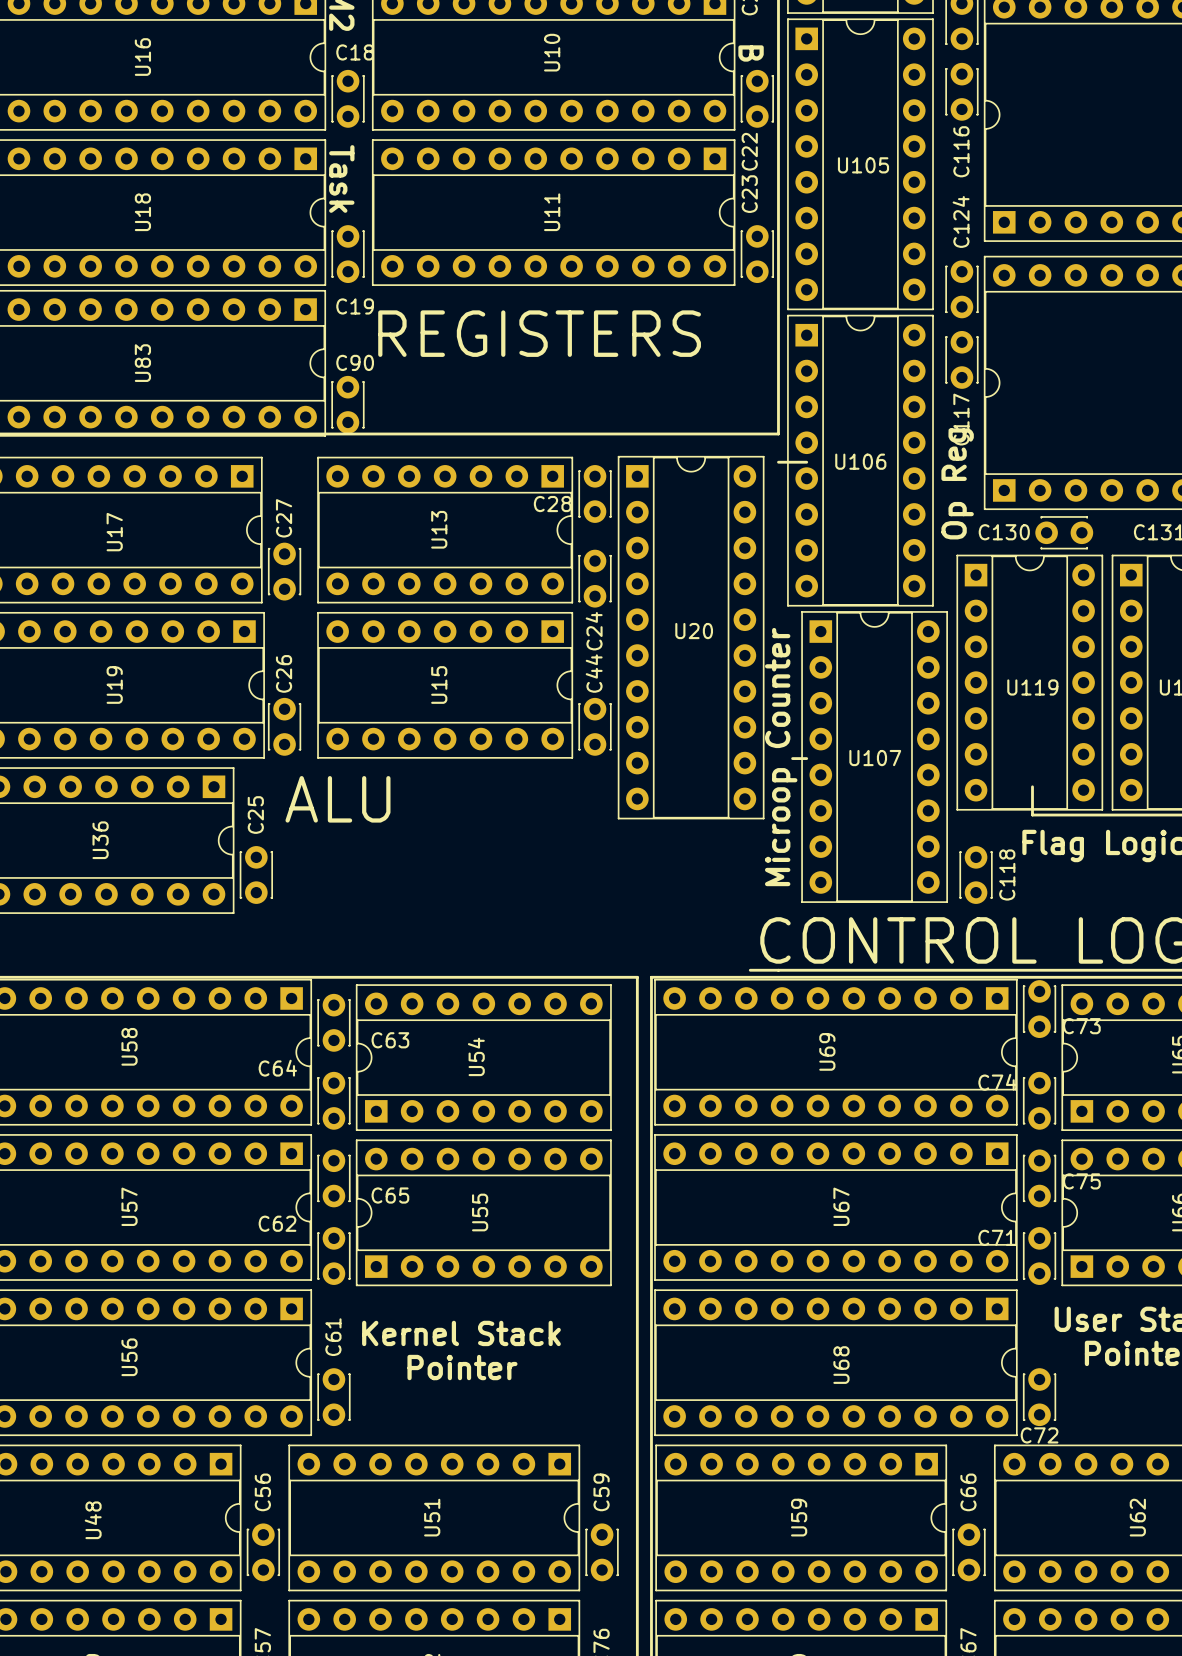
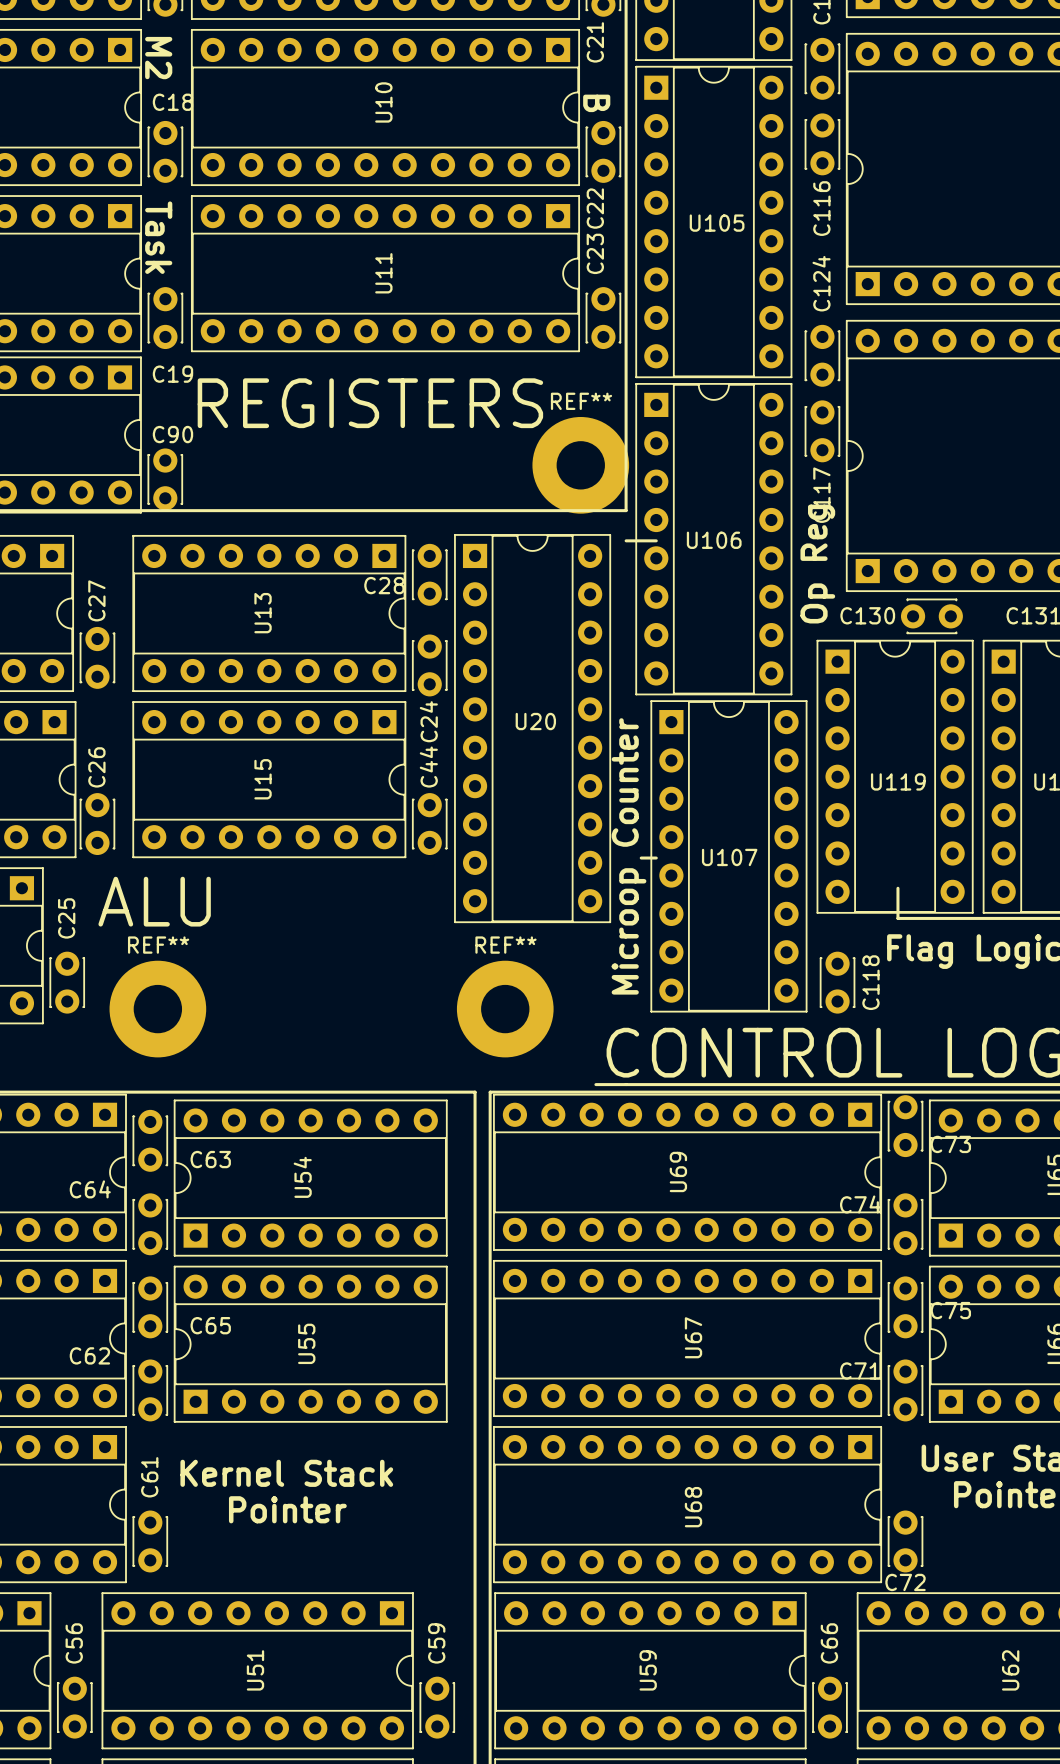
REF**: none -> (580, 465)
REF**: none -> (157, 1009)
REF**: none -> (505, 1009)

